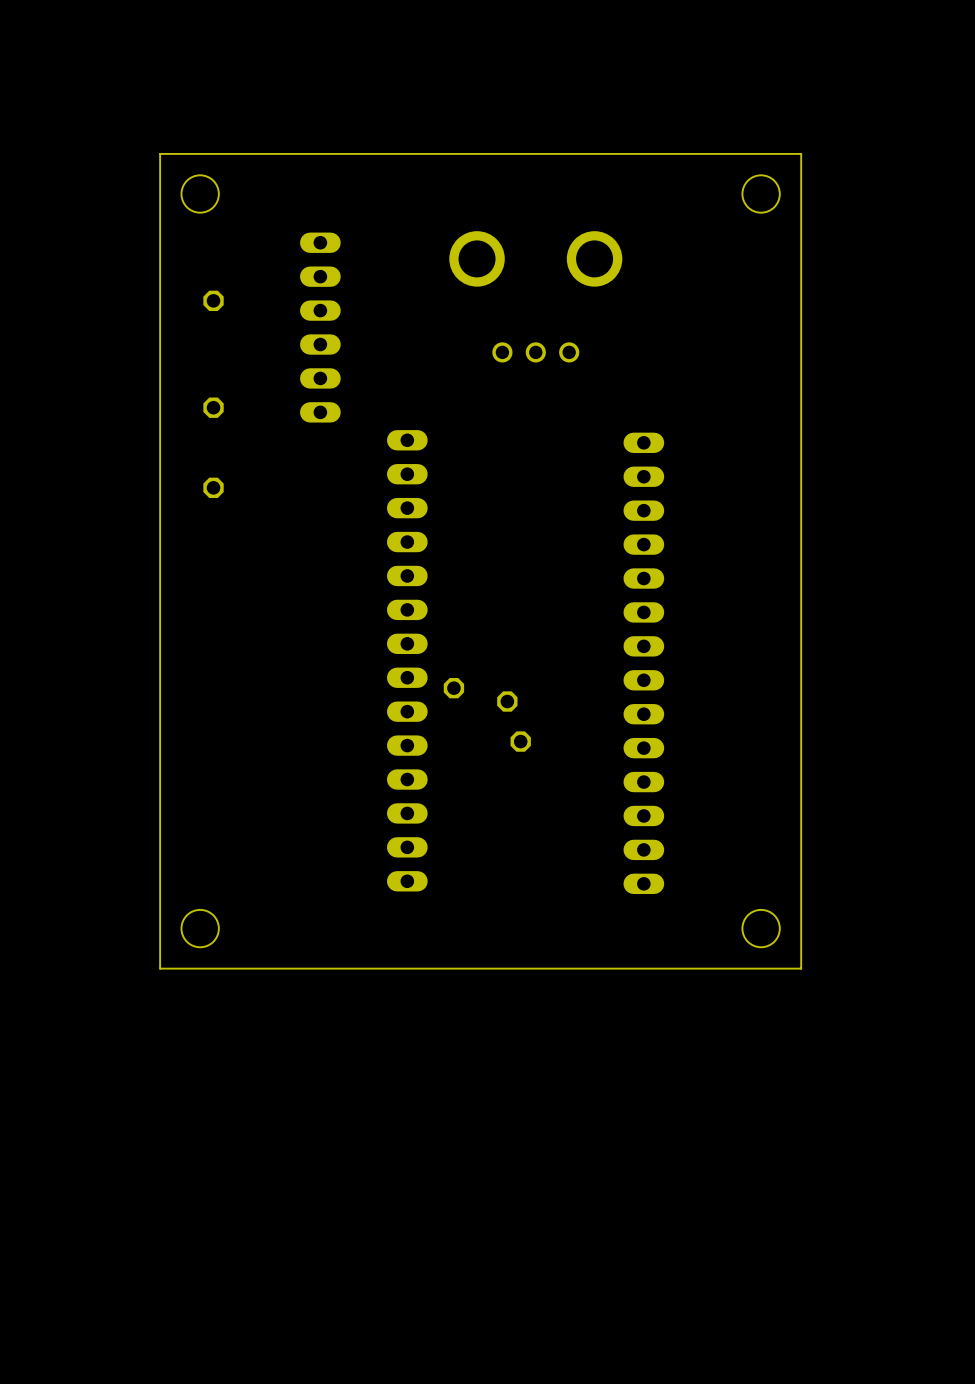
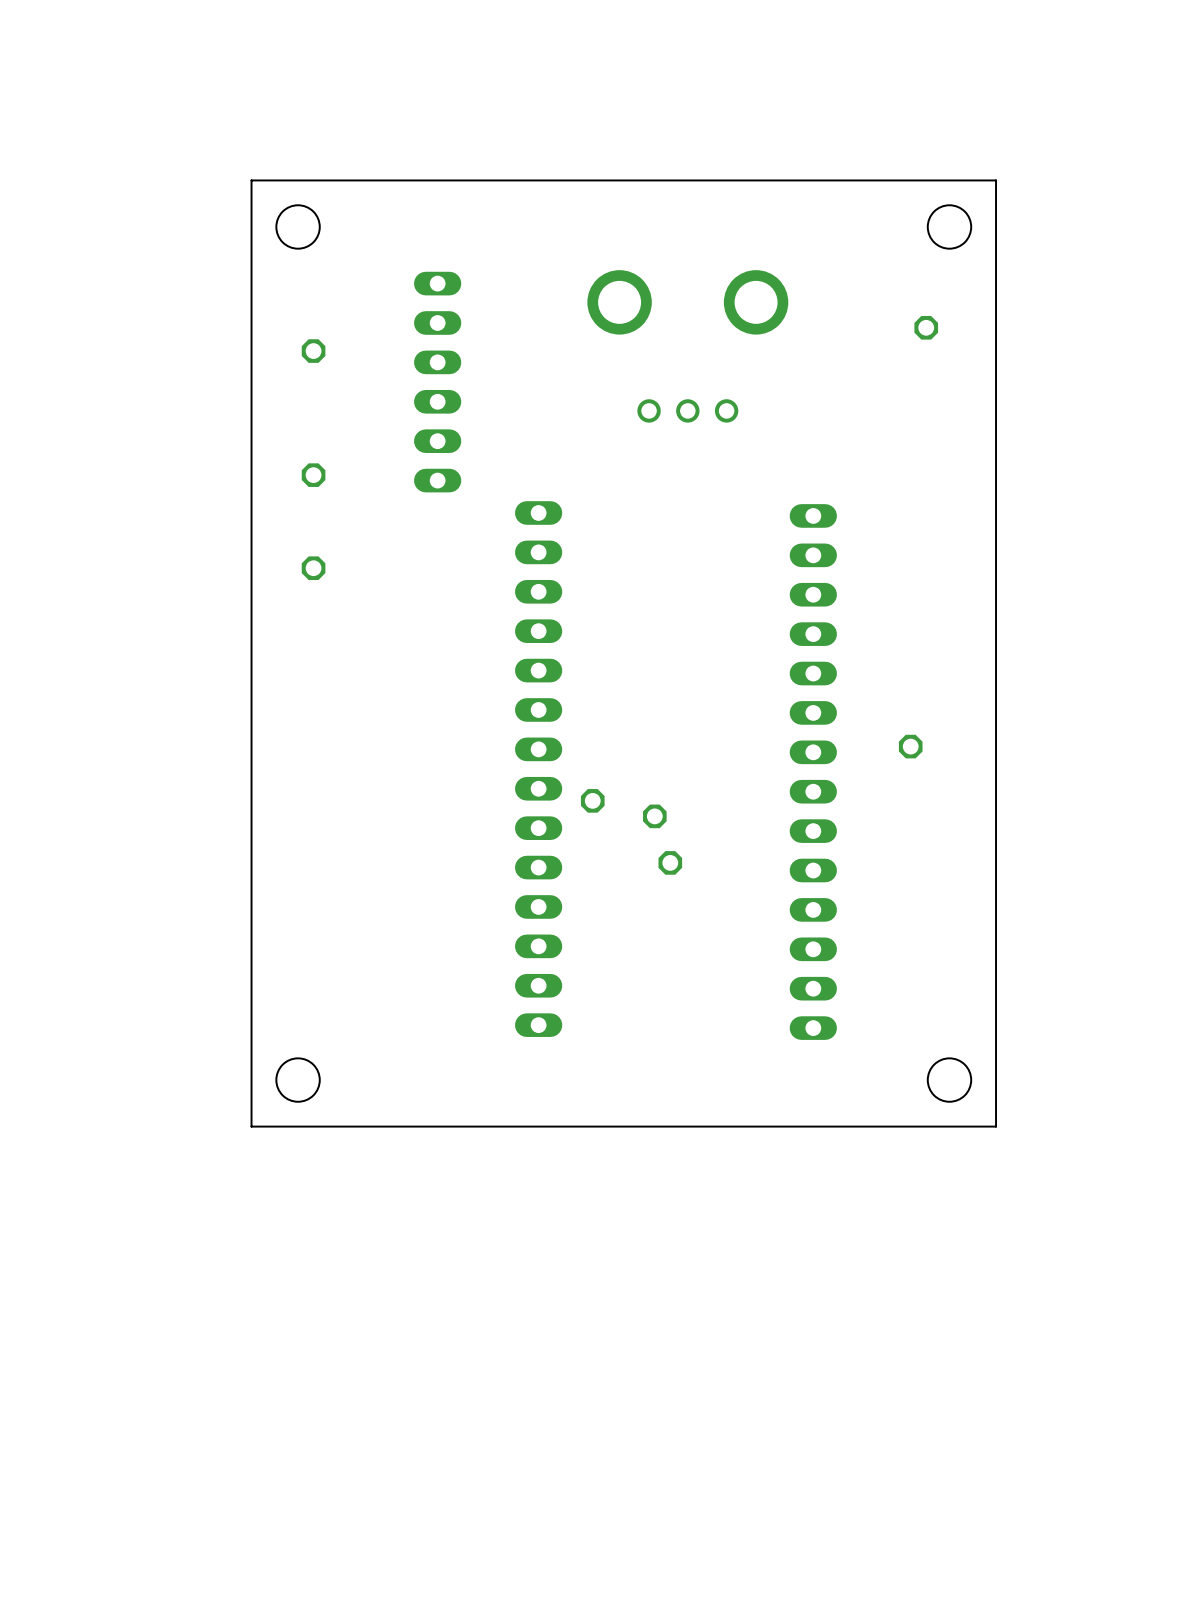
part: none -> (926, 327)
part: none -> (910, 746)

